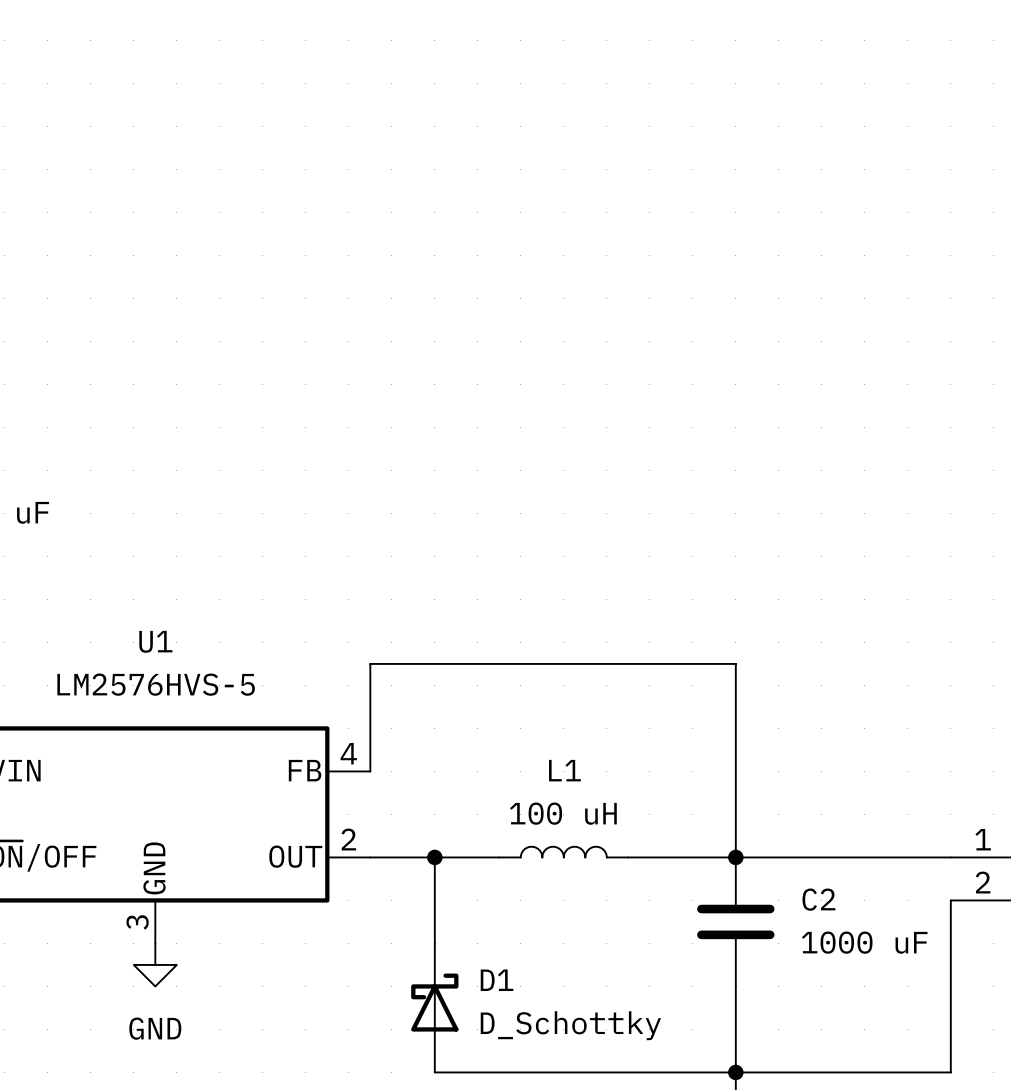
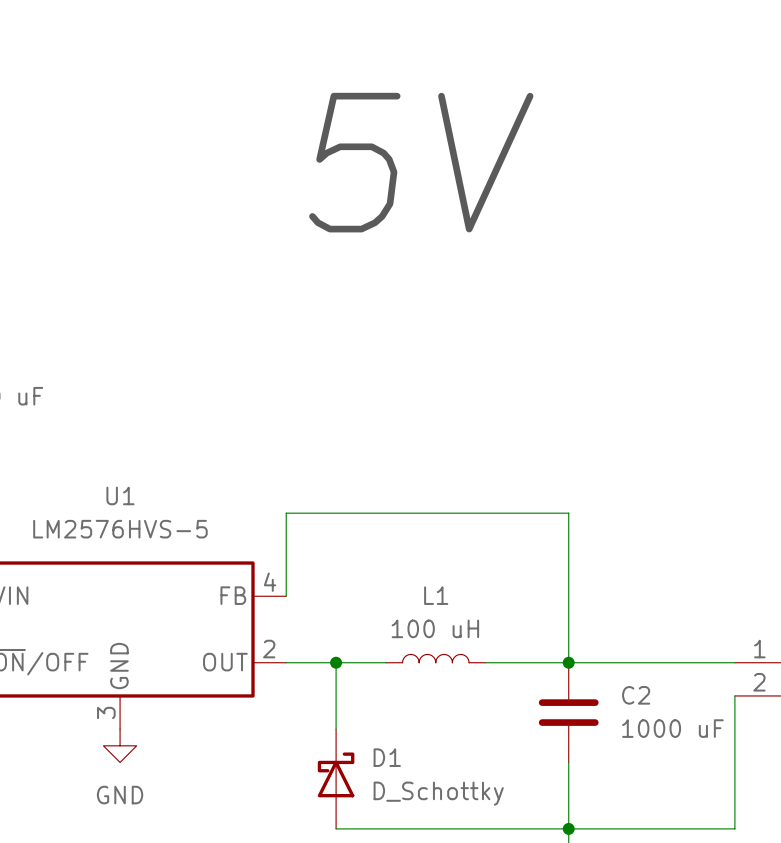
text: none -> 5V (421, 162)

